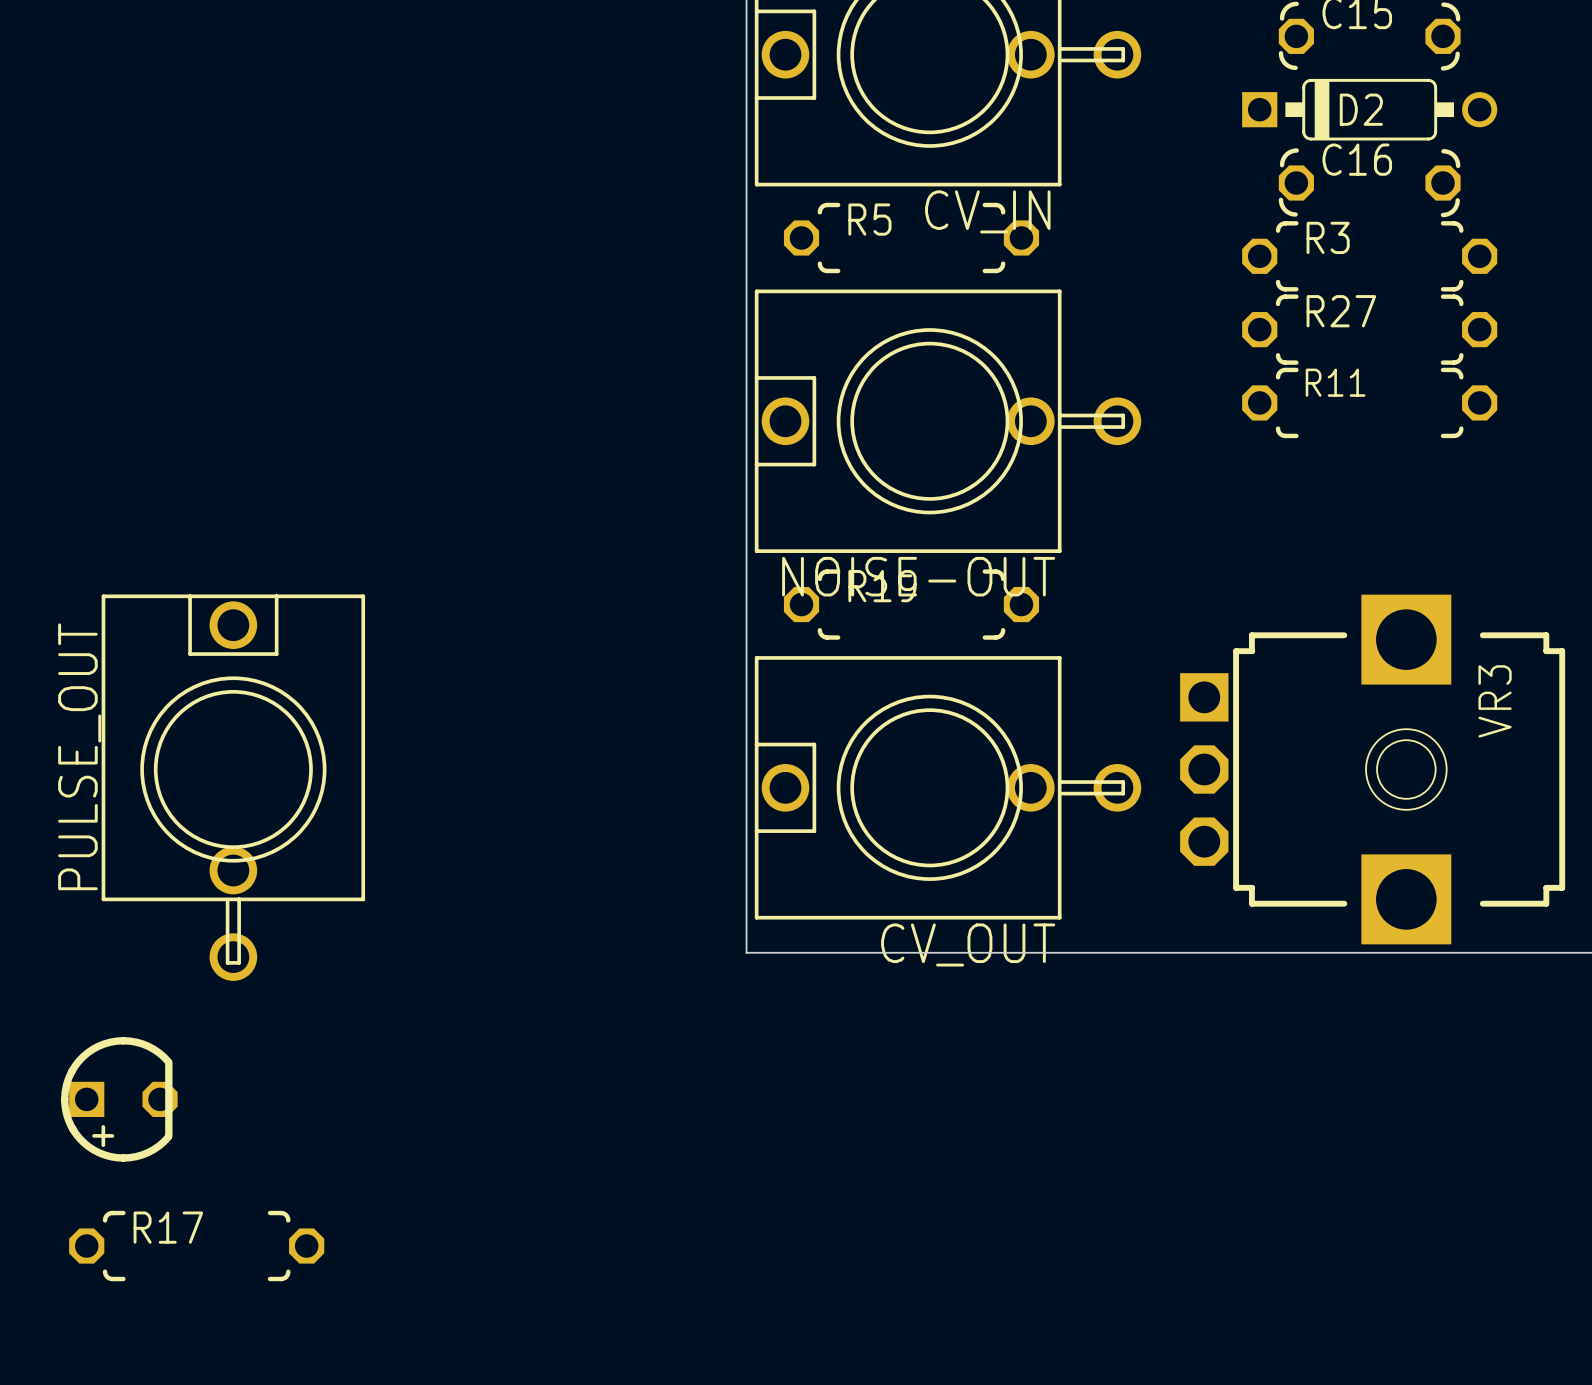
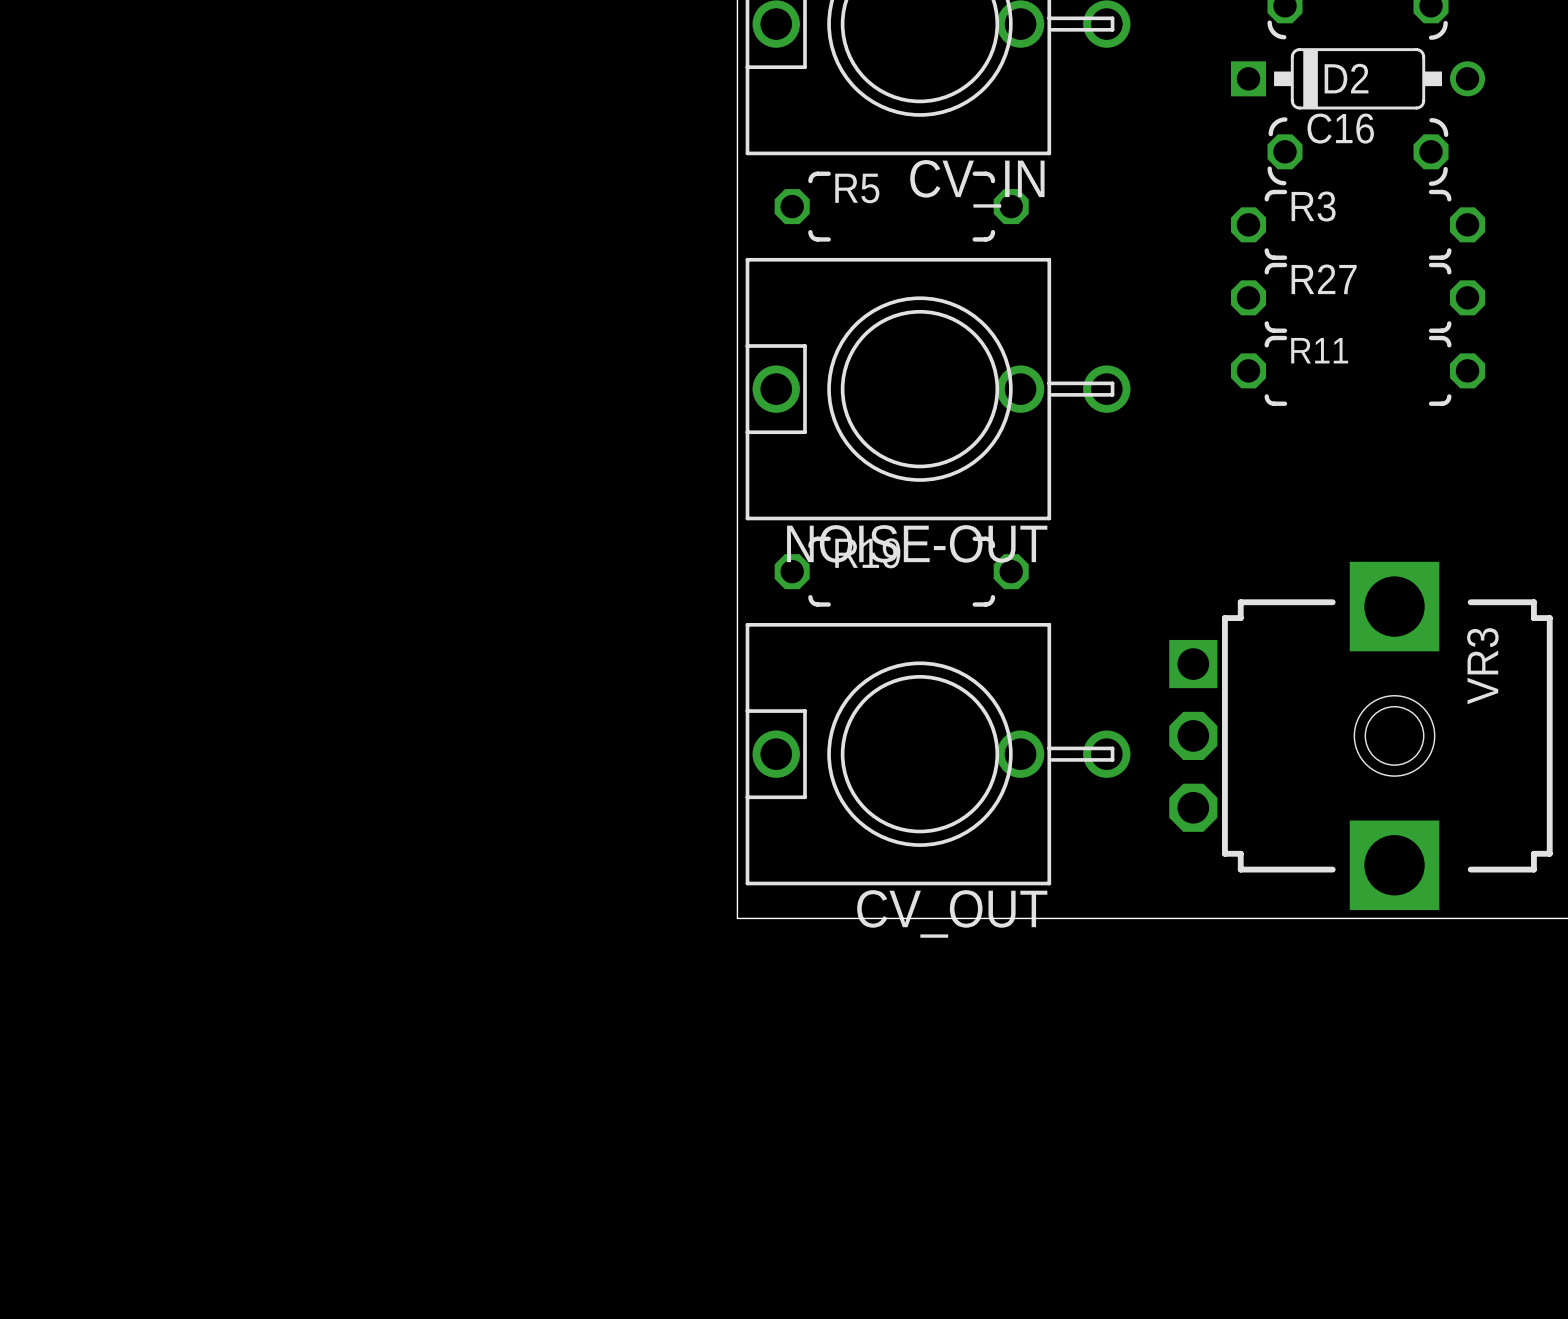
PULSE_OUT: (233, 787) -> none
part: (119, 1099) -> none
R17: (196, 1246) -> none

